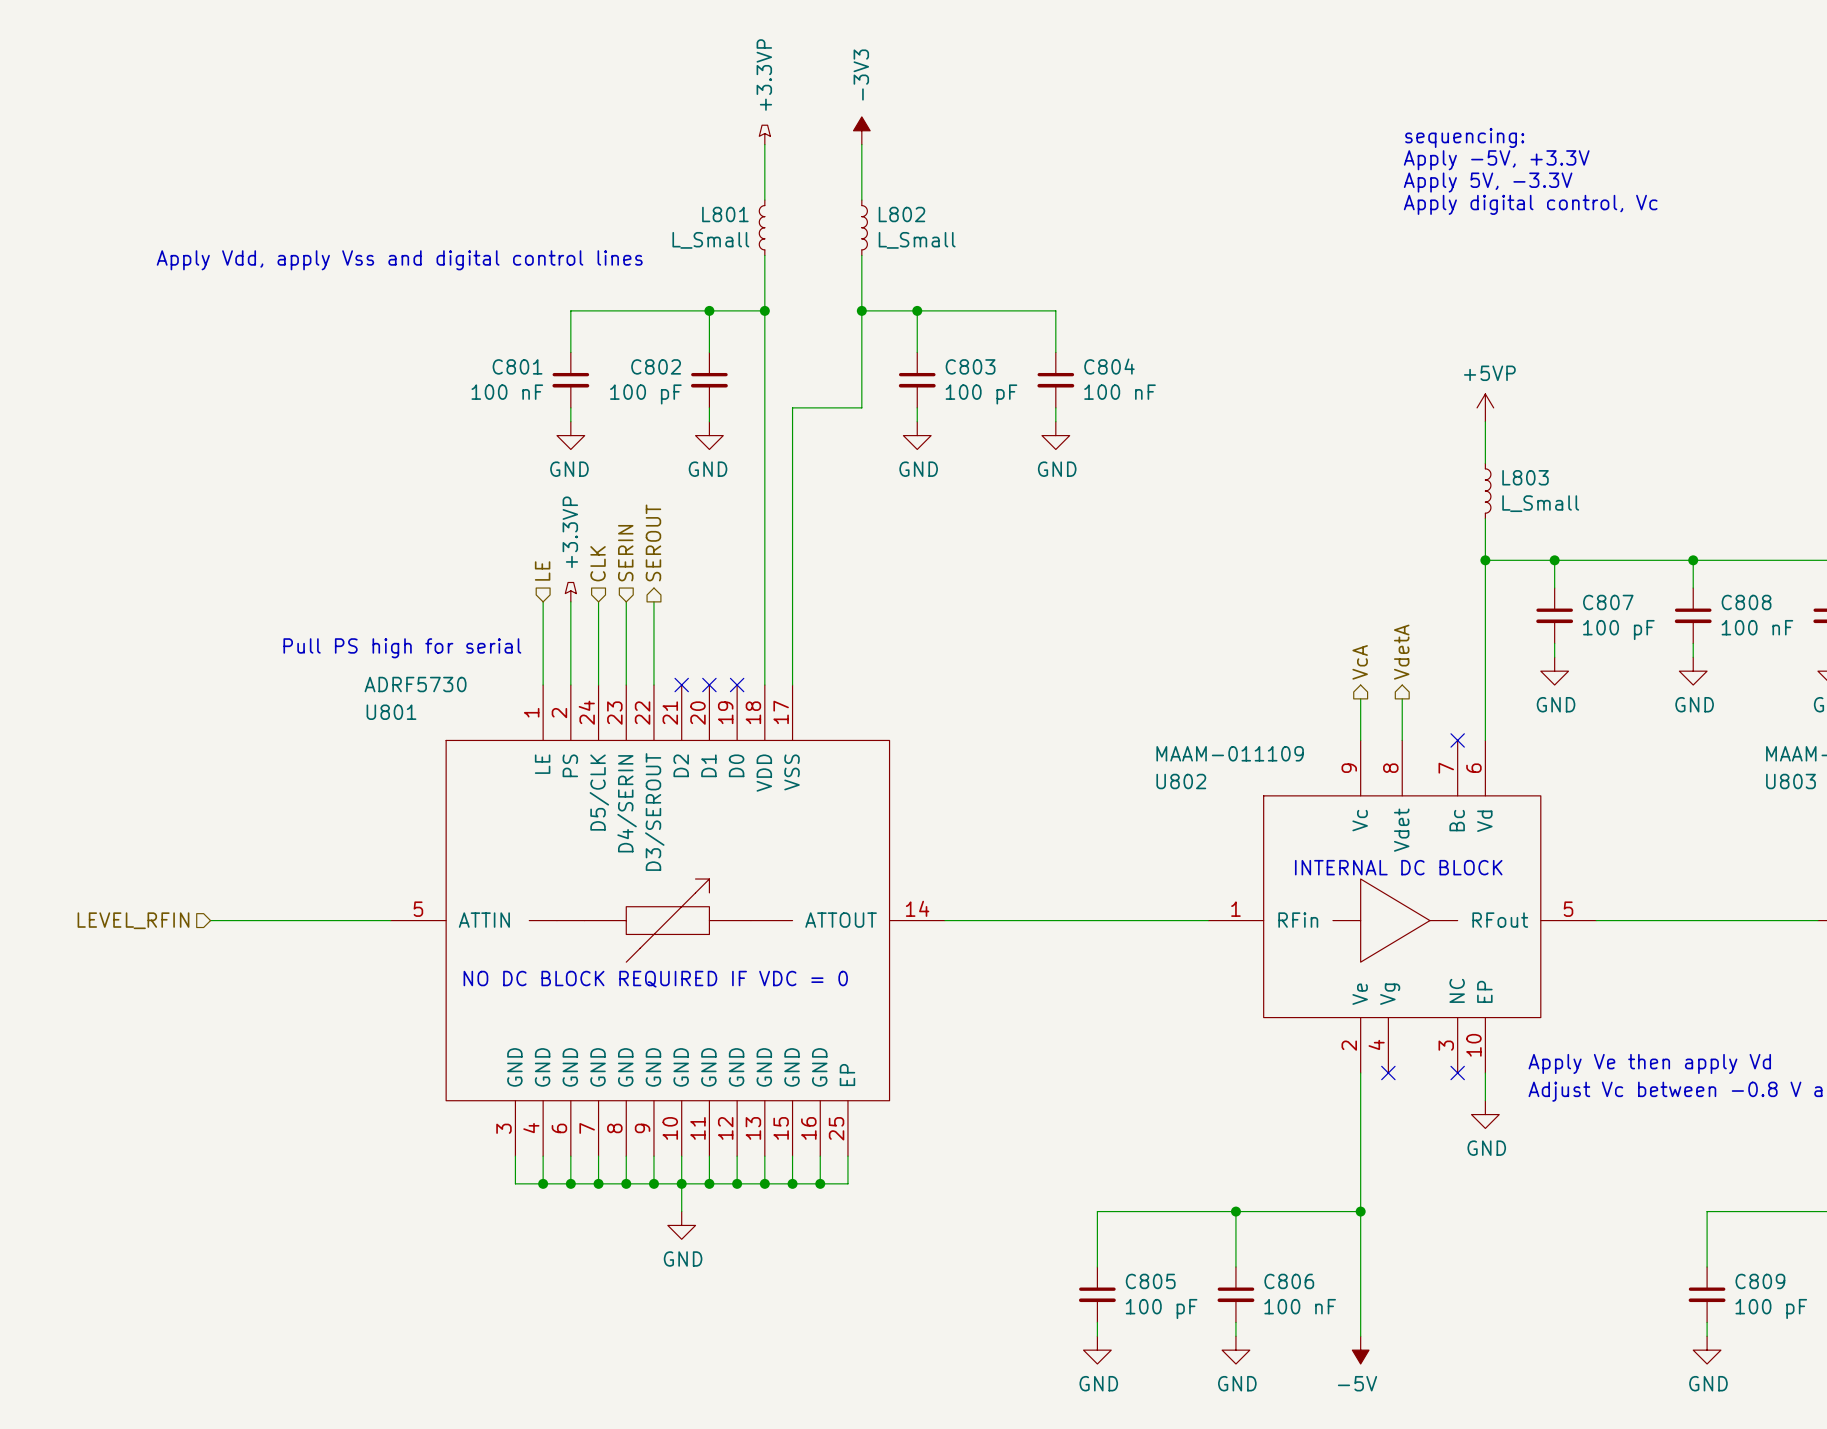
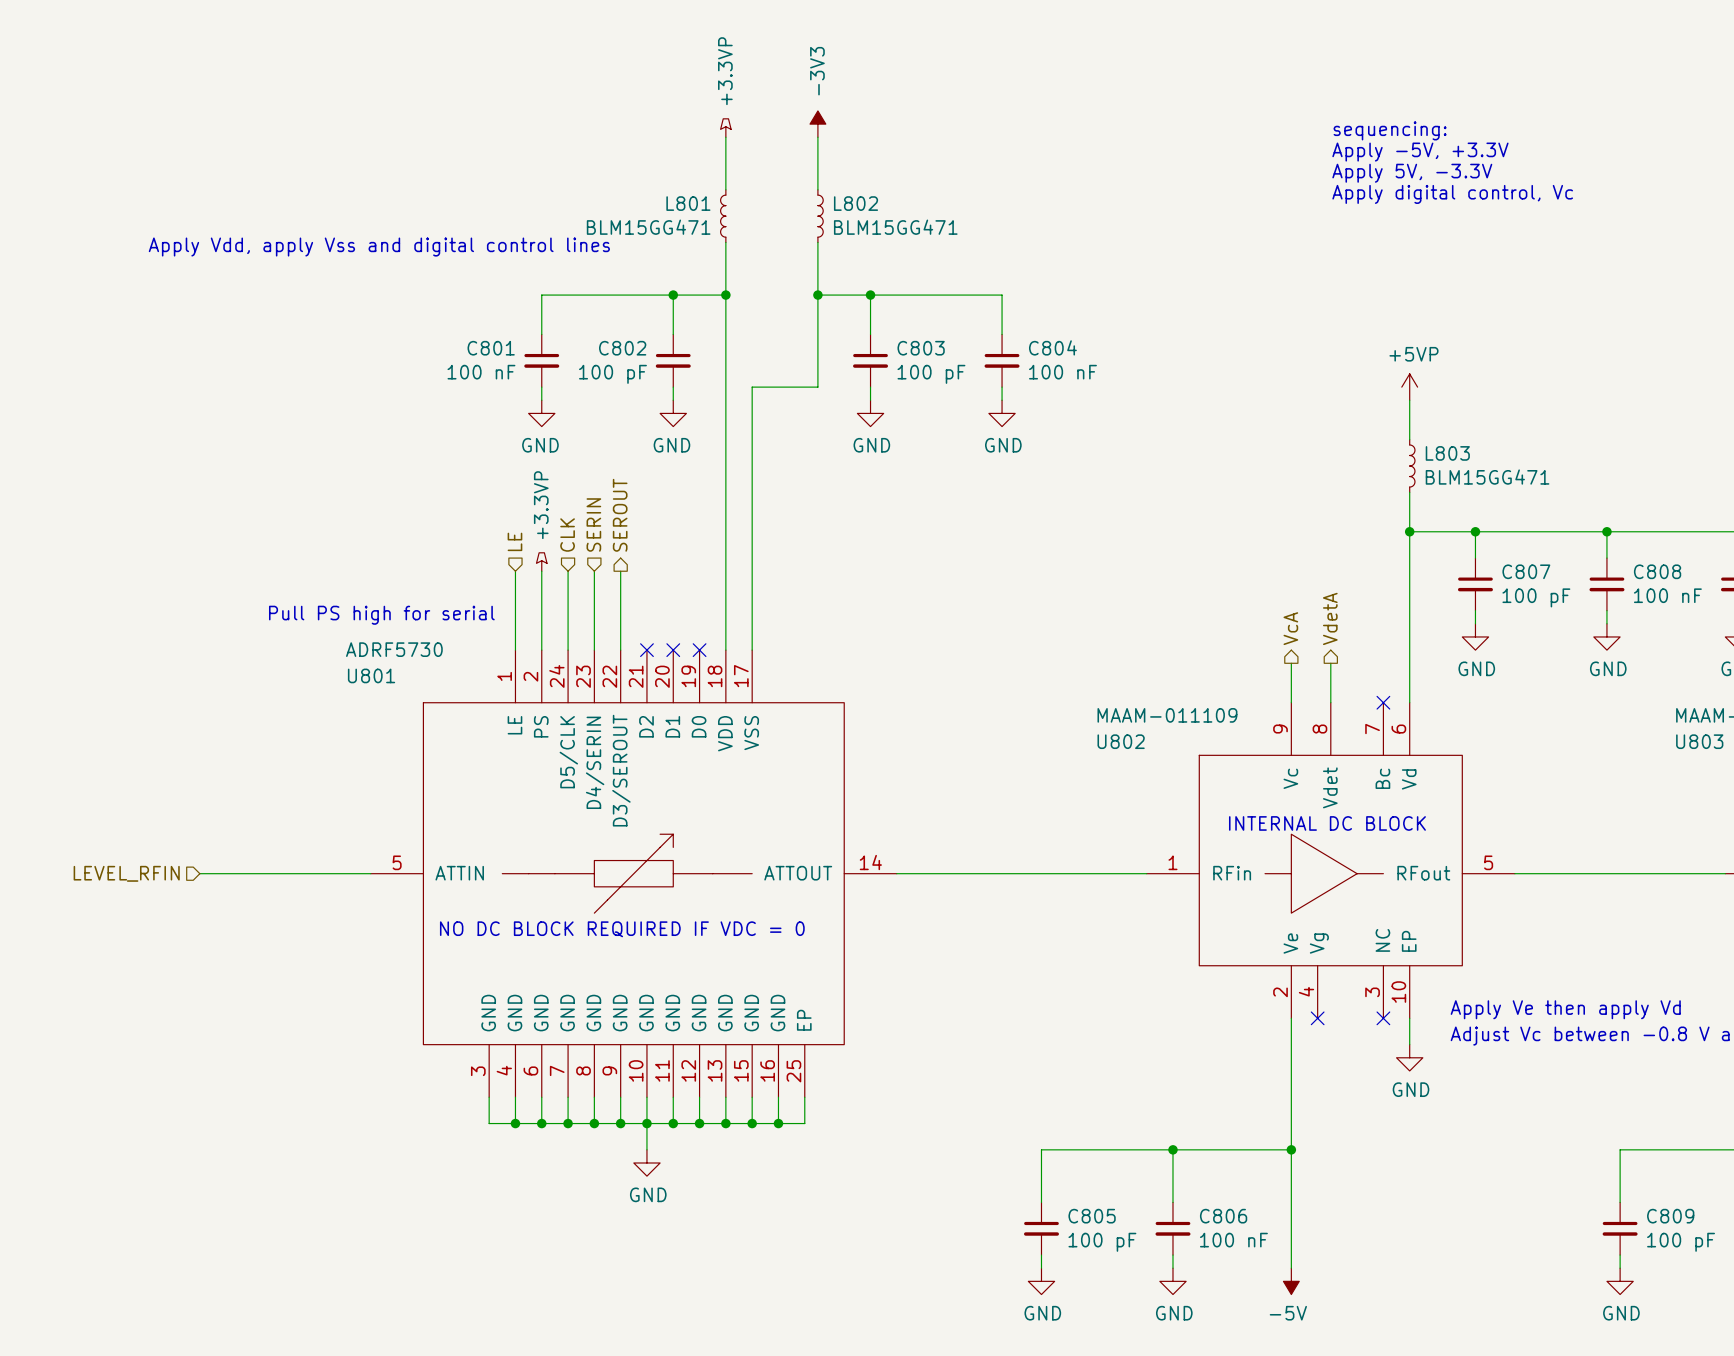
L801 value: L_Small (710, 240) -> BLM15GG471 (648, 227)
L802 value: L_Small (917, 240) -> BLM15GG471 (895, 227)
L803 value: L_Small (1540, 503) -> BLM15GG471 (1487, 477)

